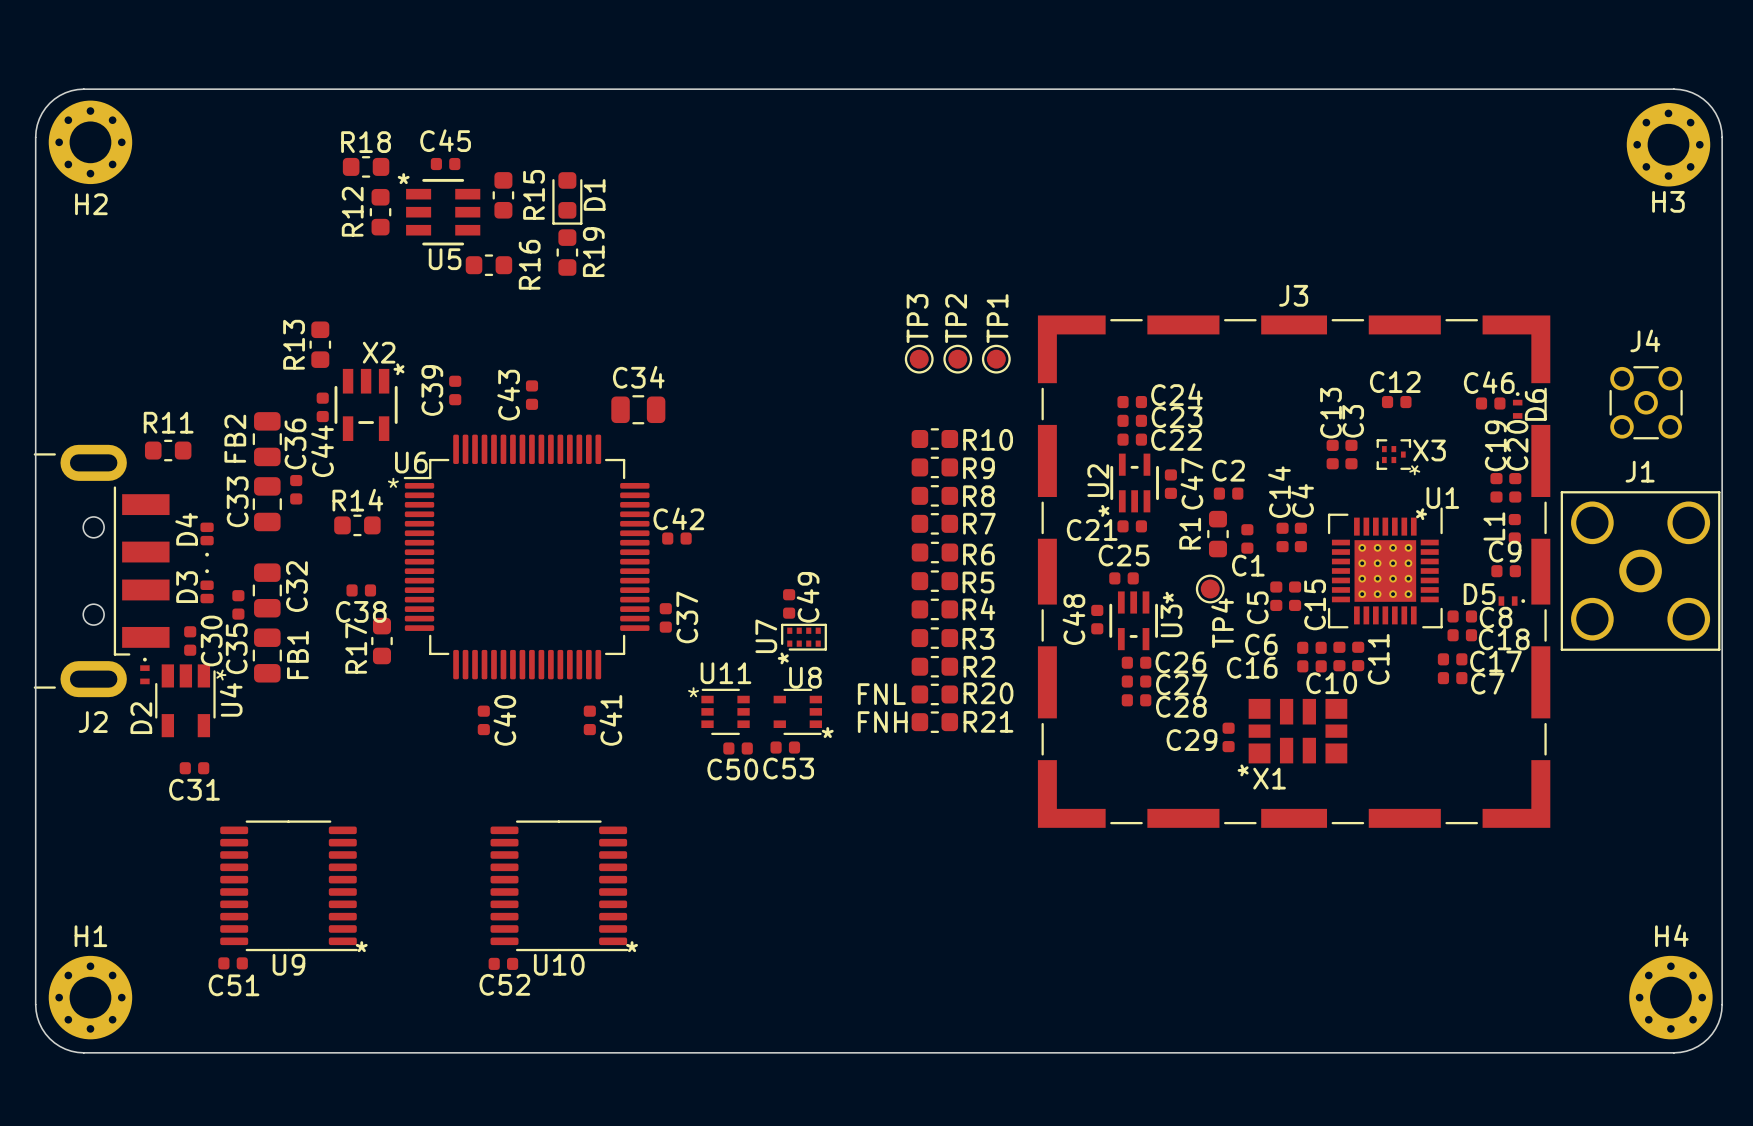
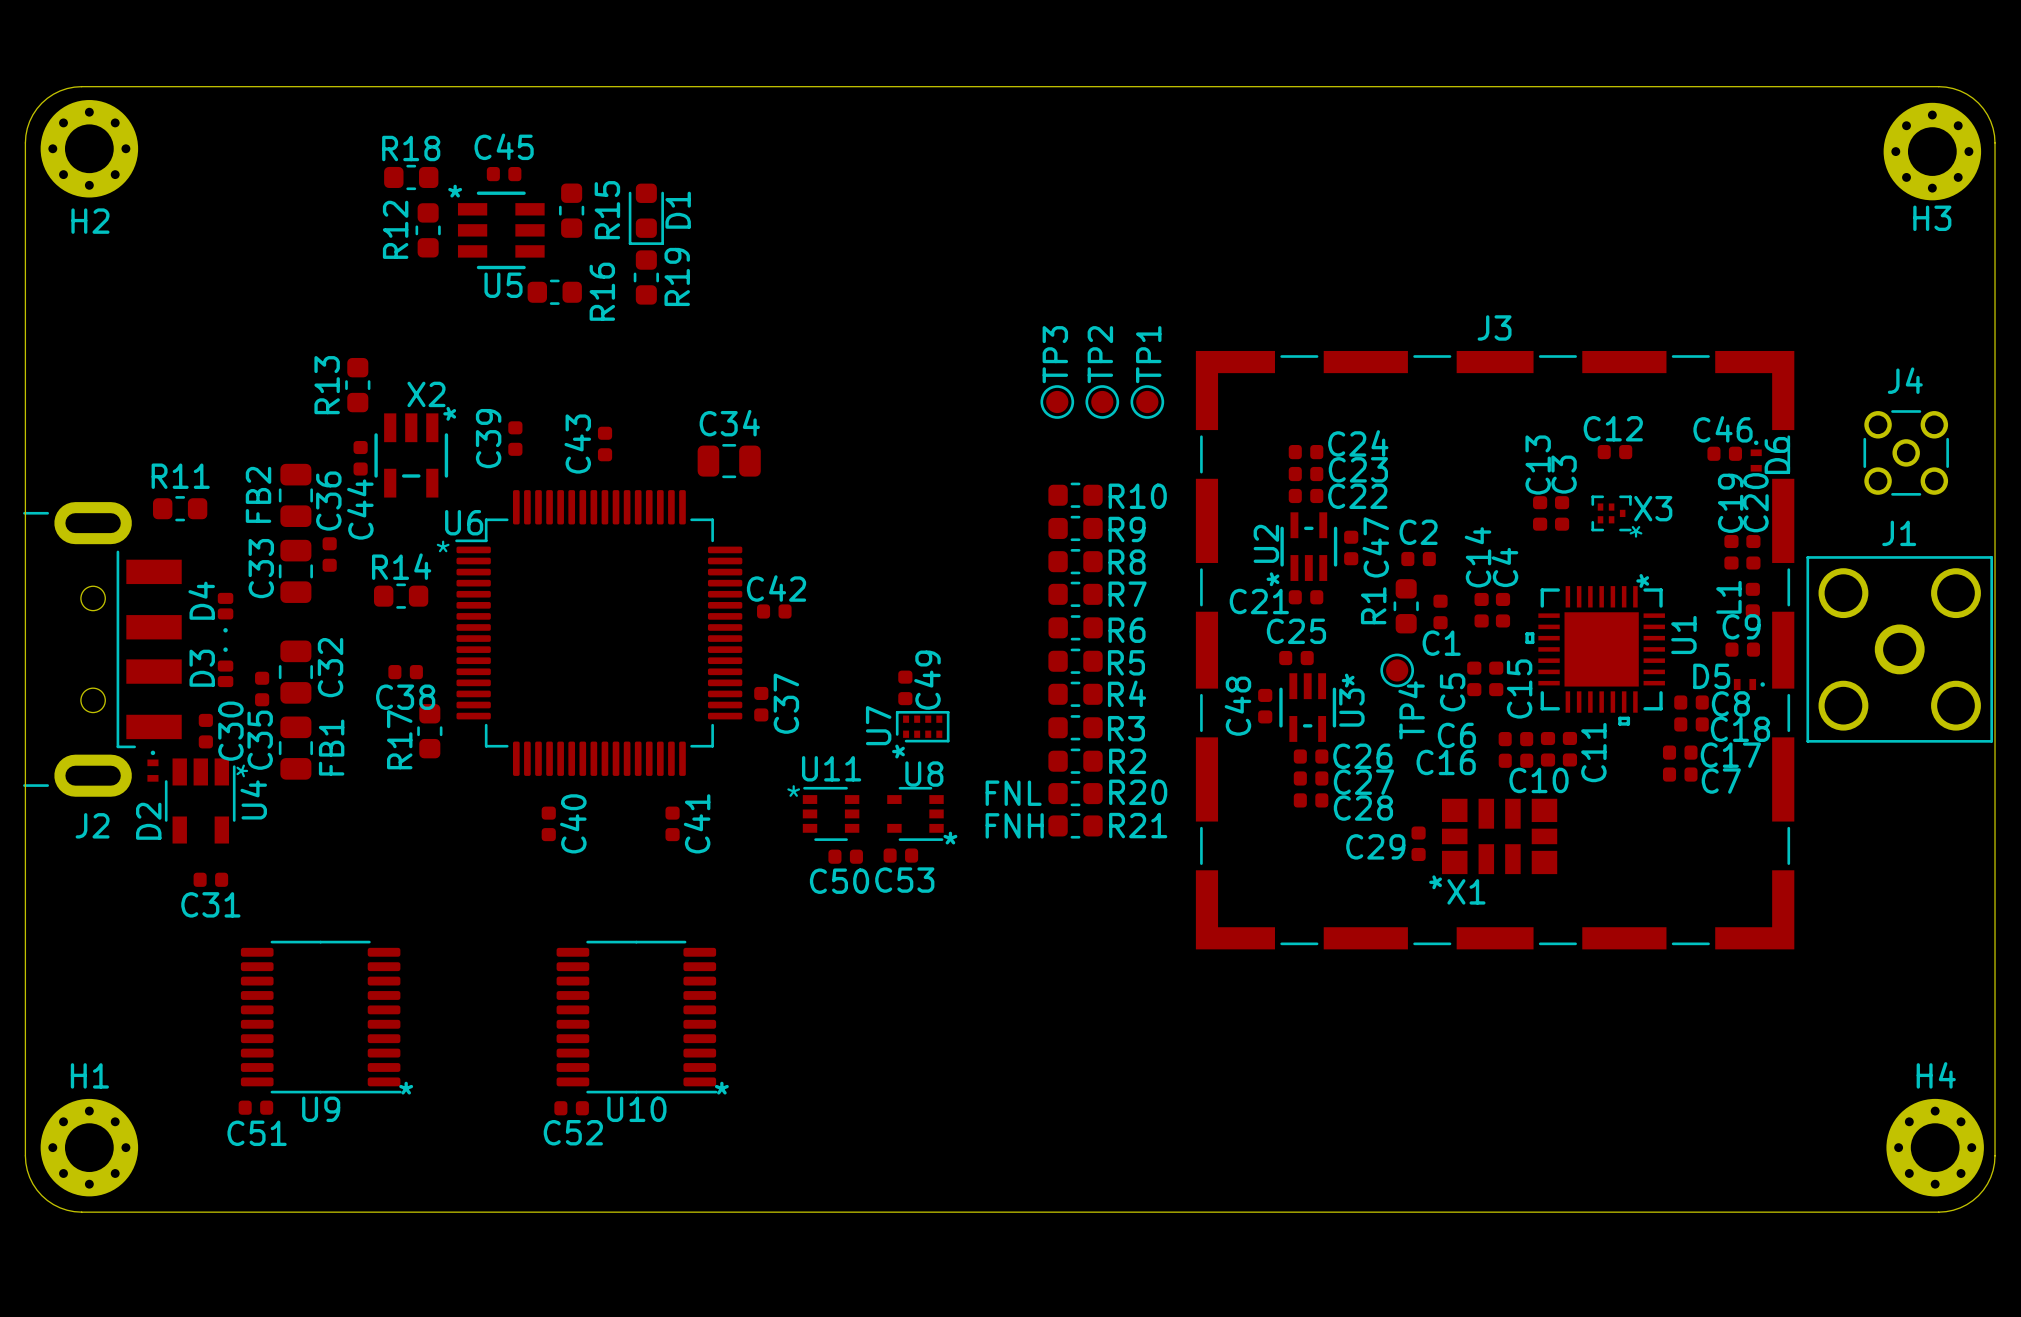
U1 name position: U1 (1442, 497) -> U1 (1683, 635)
U1 footprint: [1327, 507, 1443, 629] -> [1525, 586, 1665, 726]

